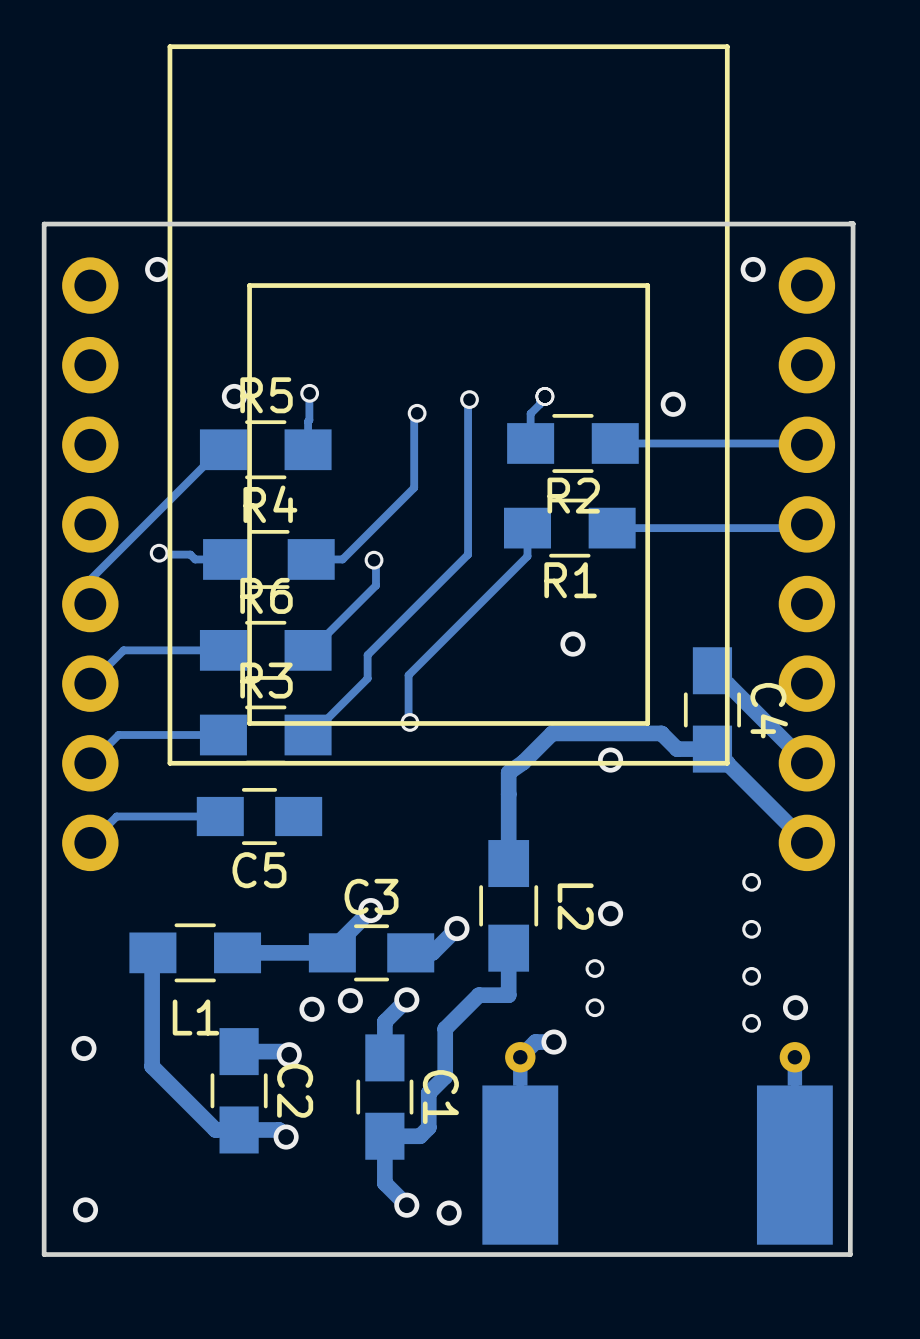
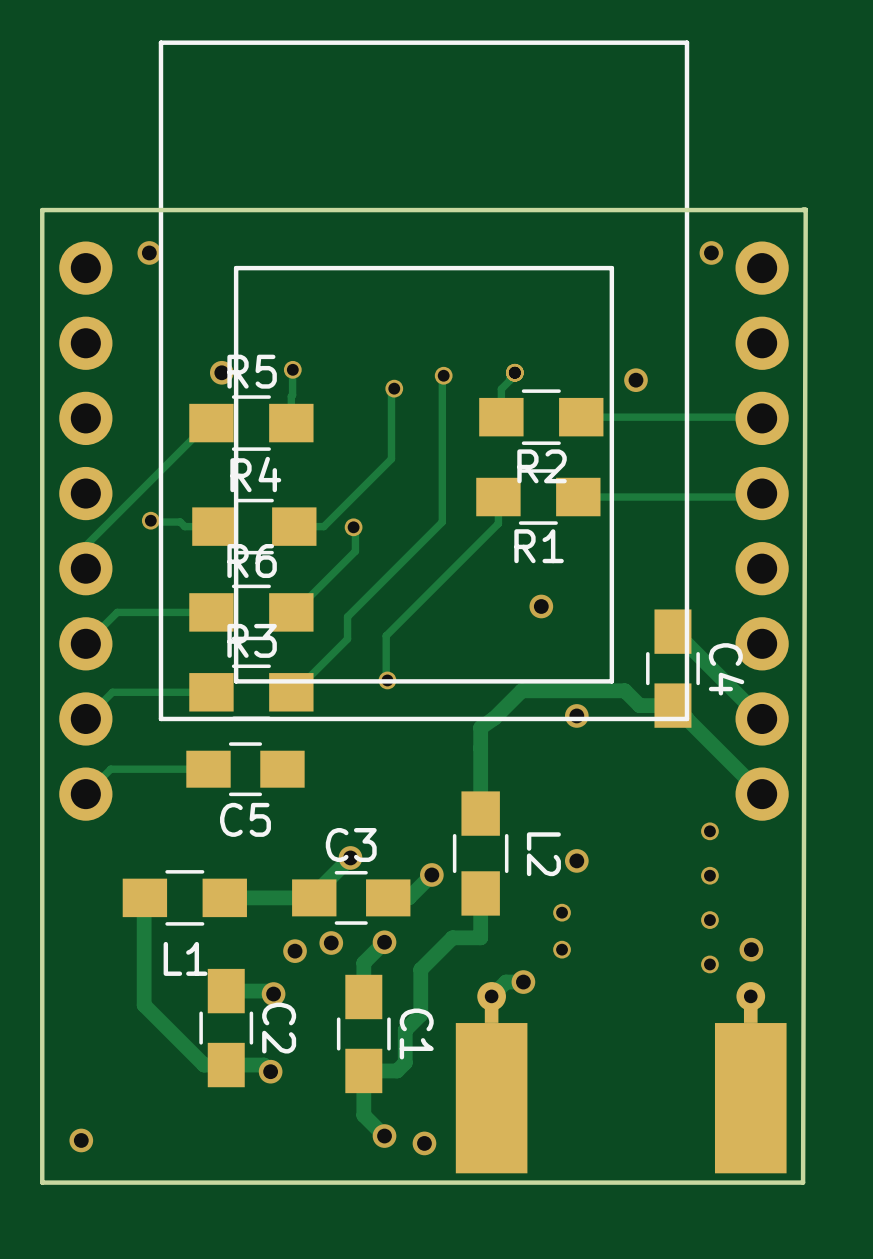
via: (83, 1048) -> none

